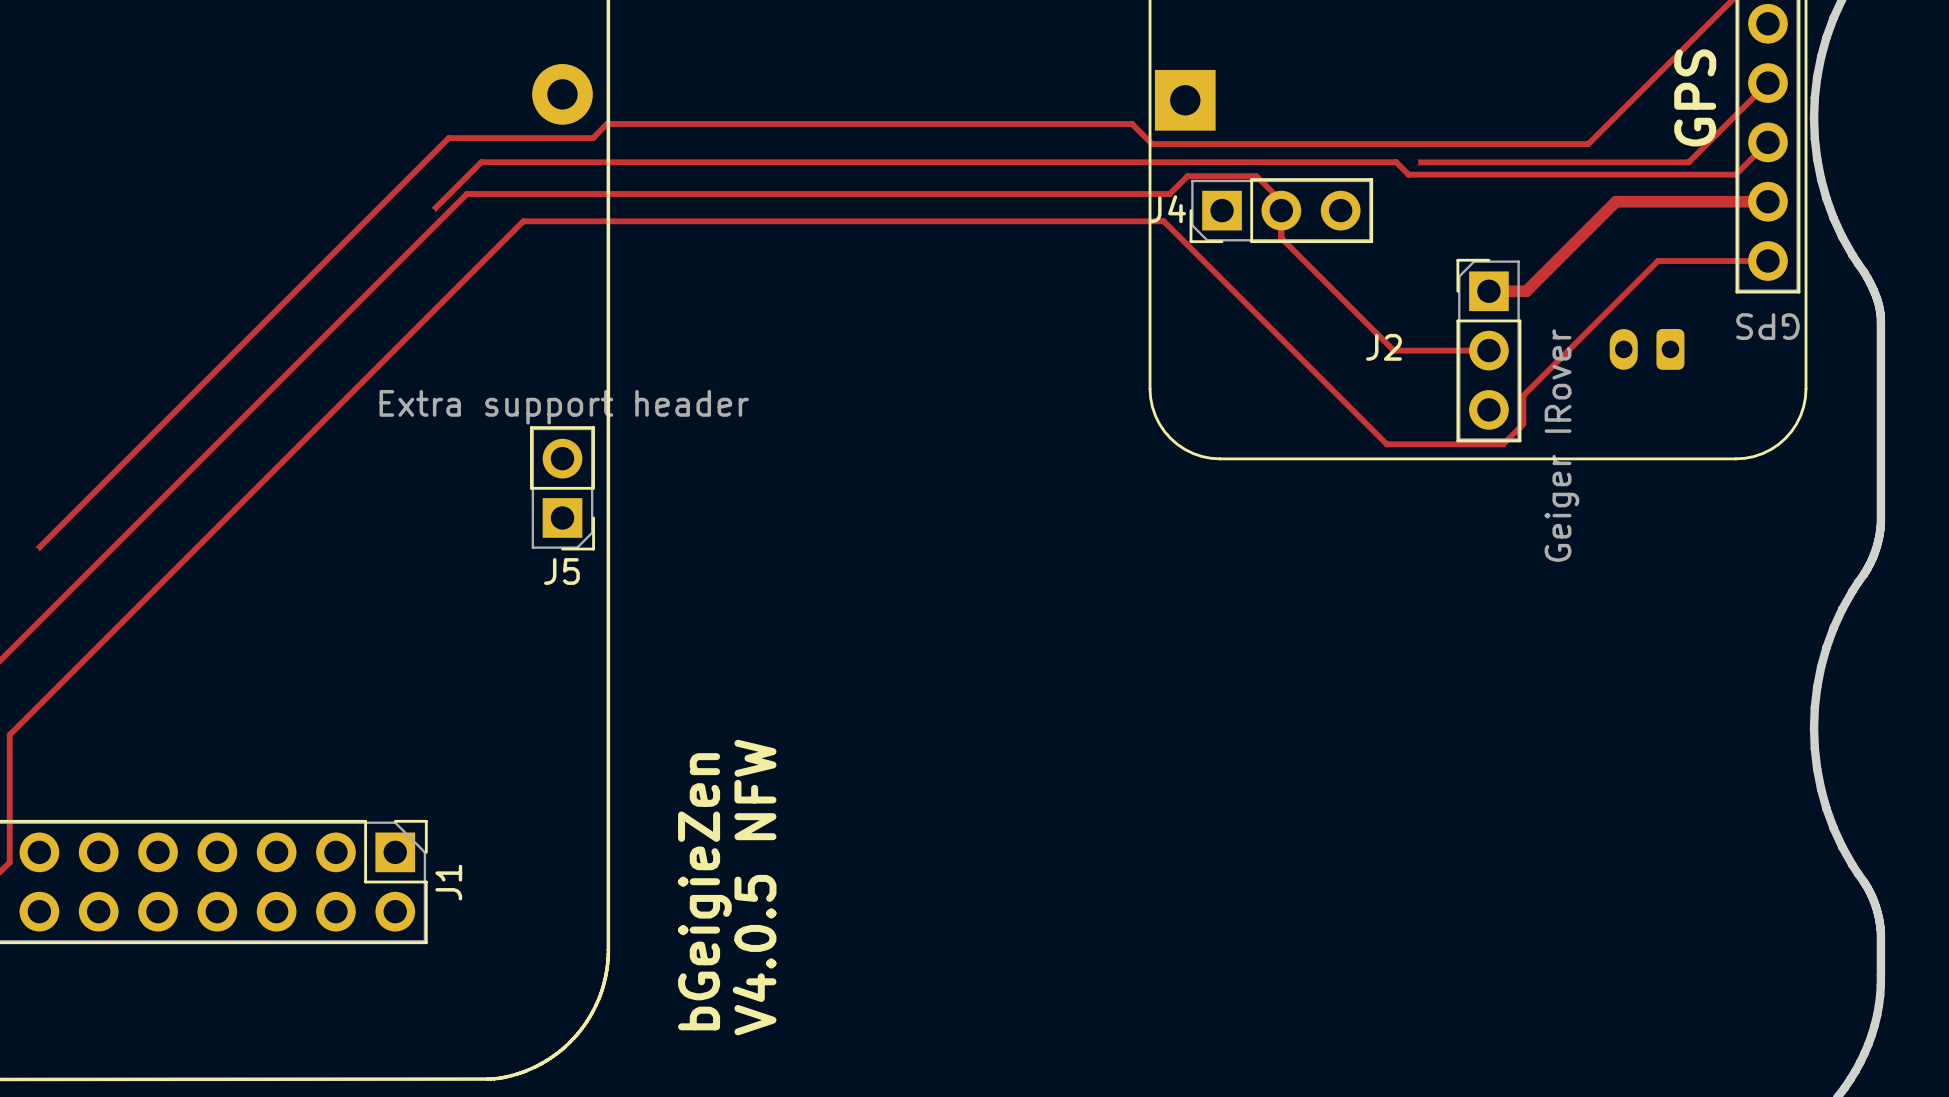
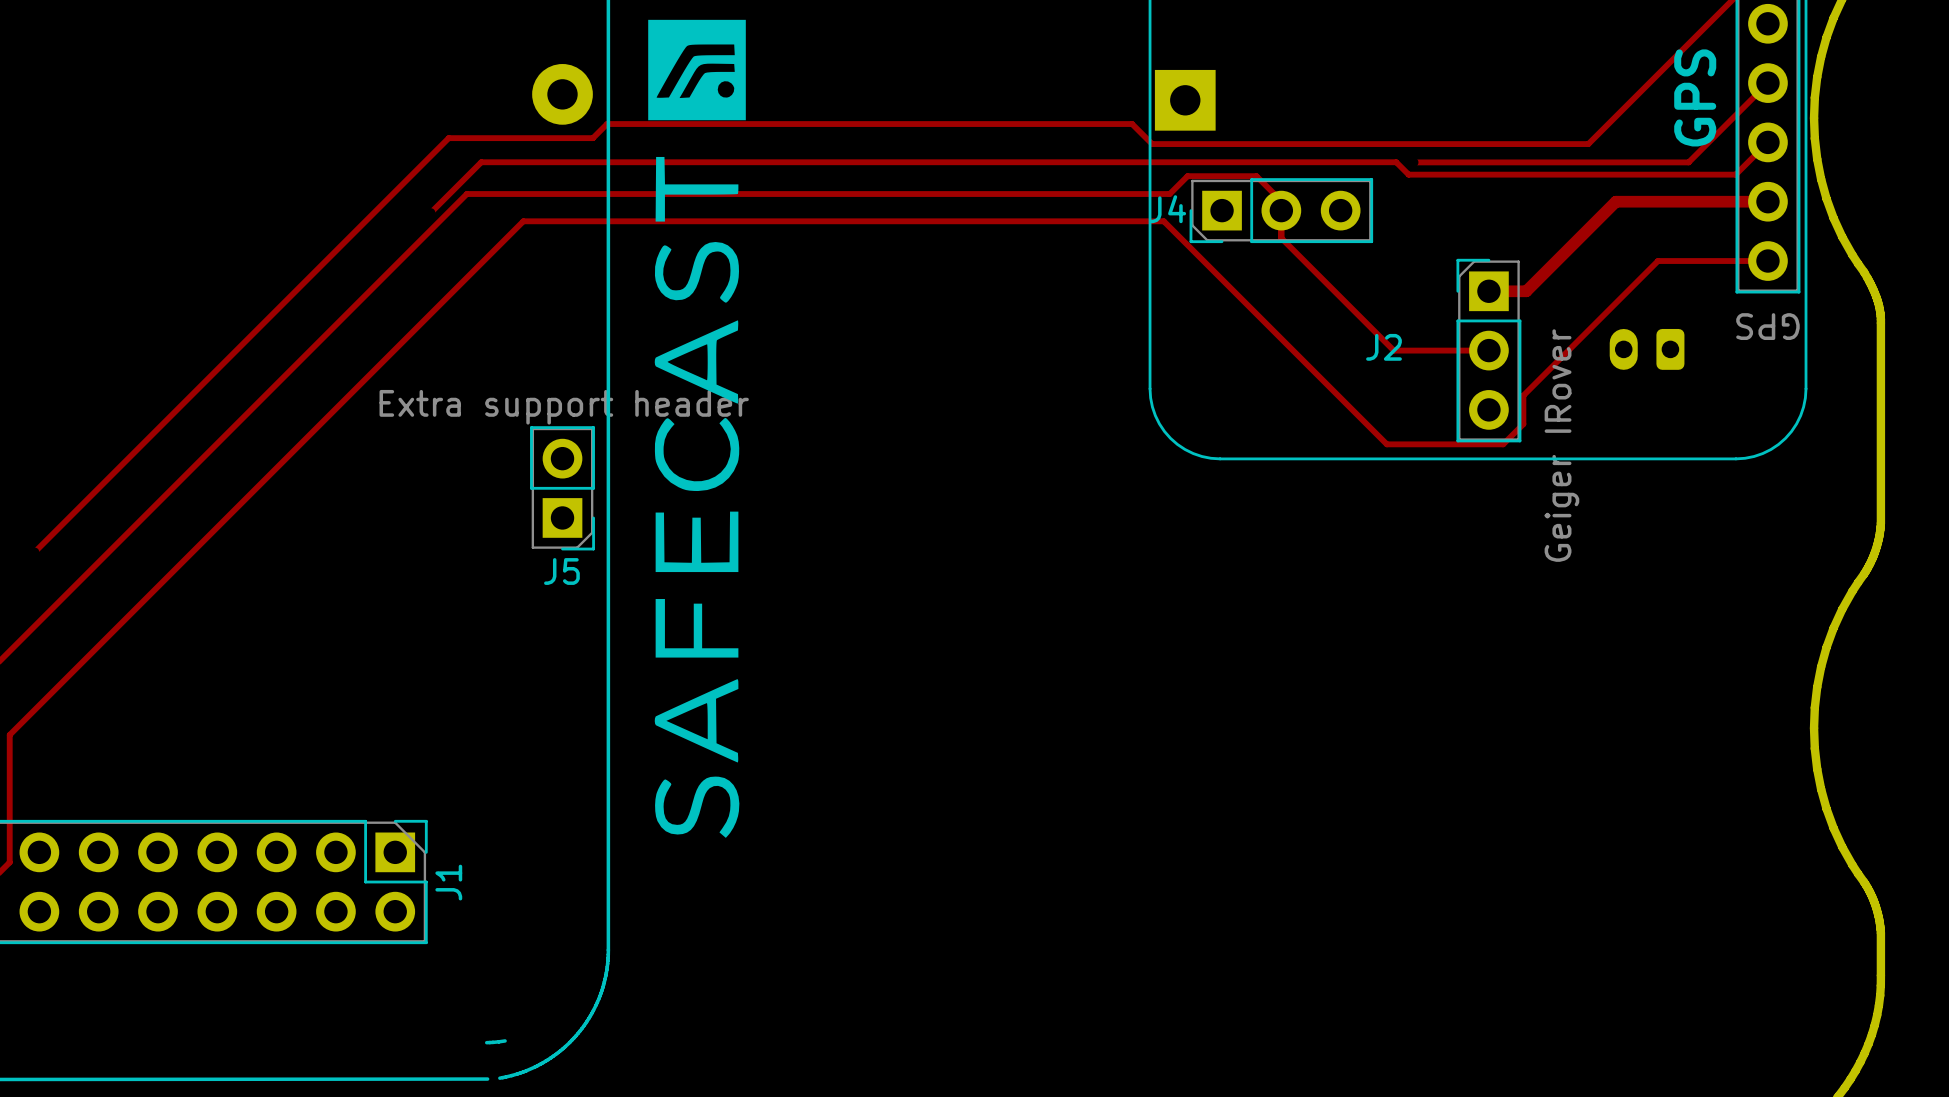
drawing: none -> [648, 19, 746, 838]
text: V4.0.5 NFW (754, 887) -> none
text: bGeigieZen (704, 891) -> none
line: none -> (505, 1040) (486, 1042)
line: (500, 1078) (487, 1079) -> none

